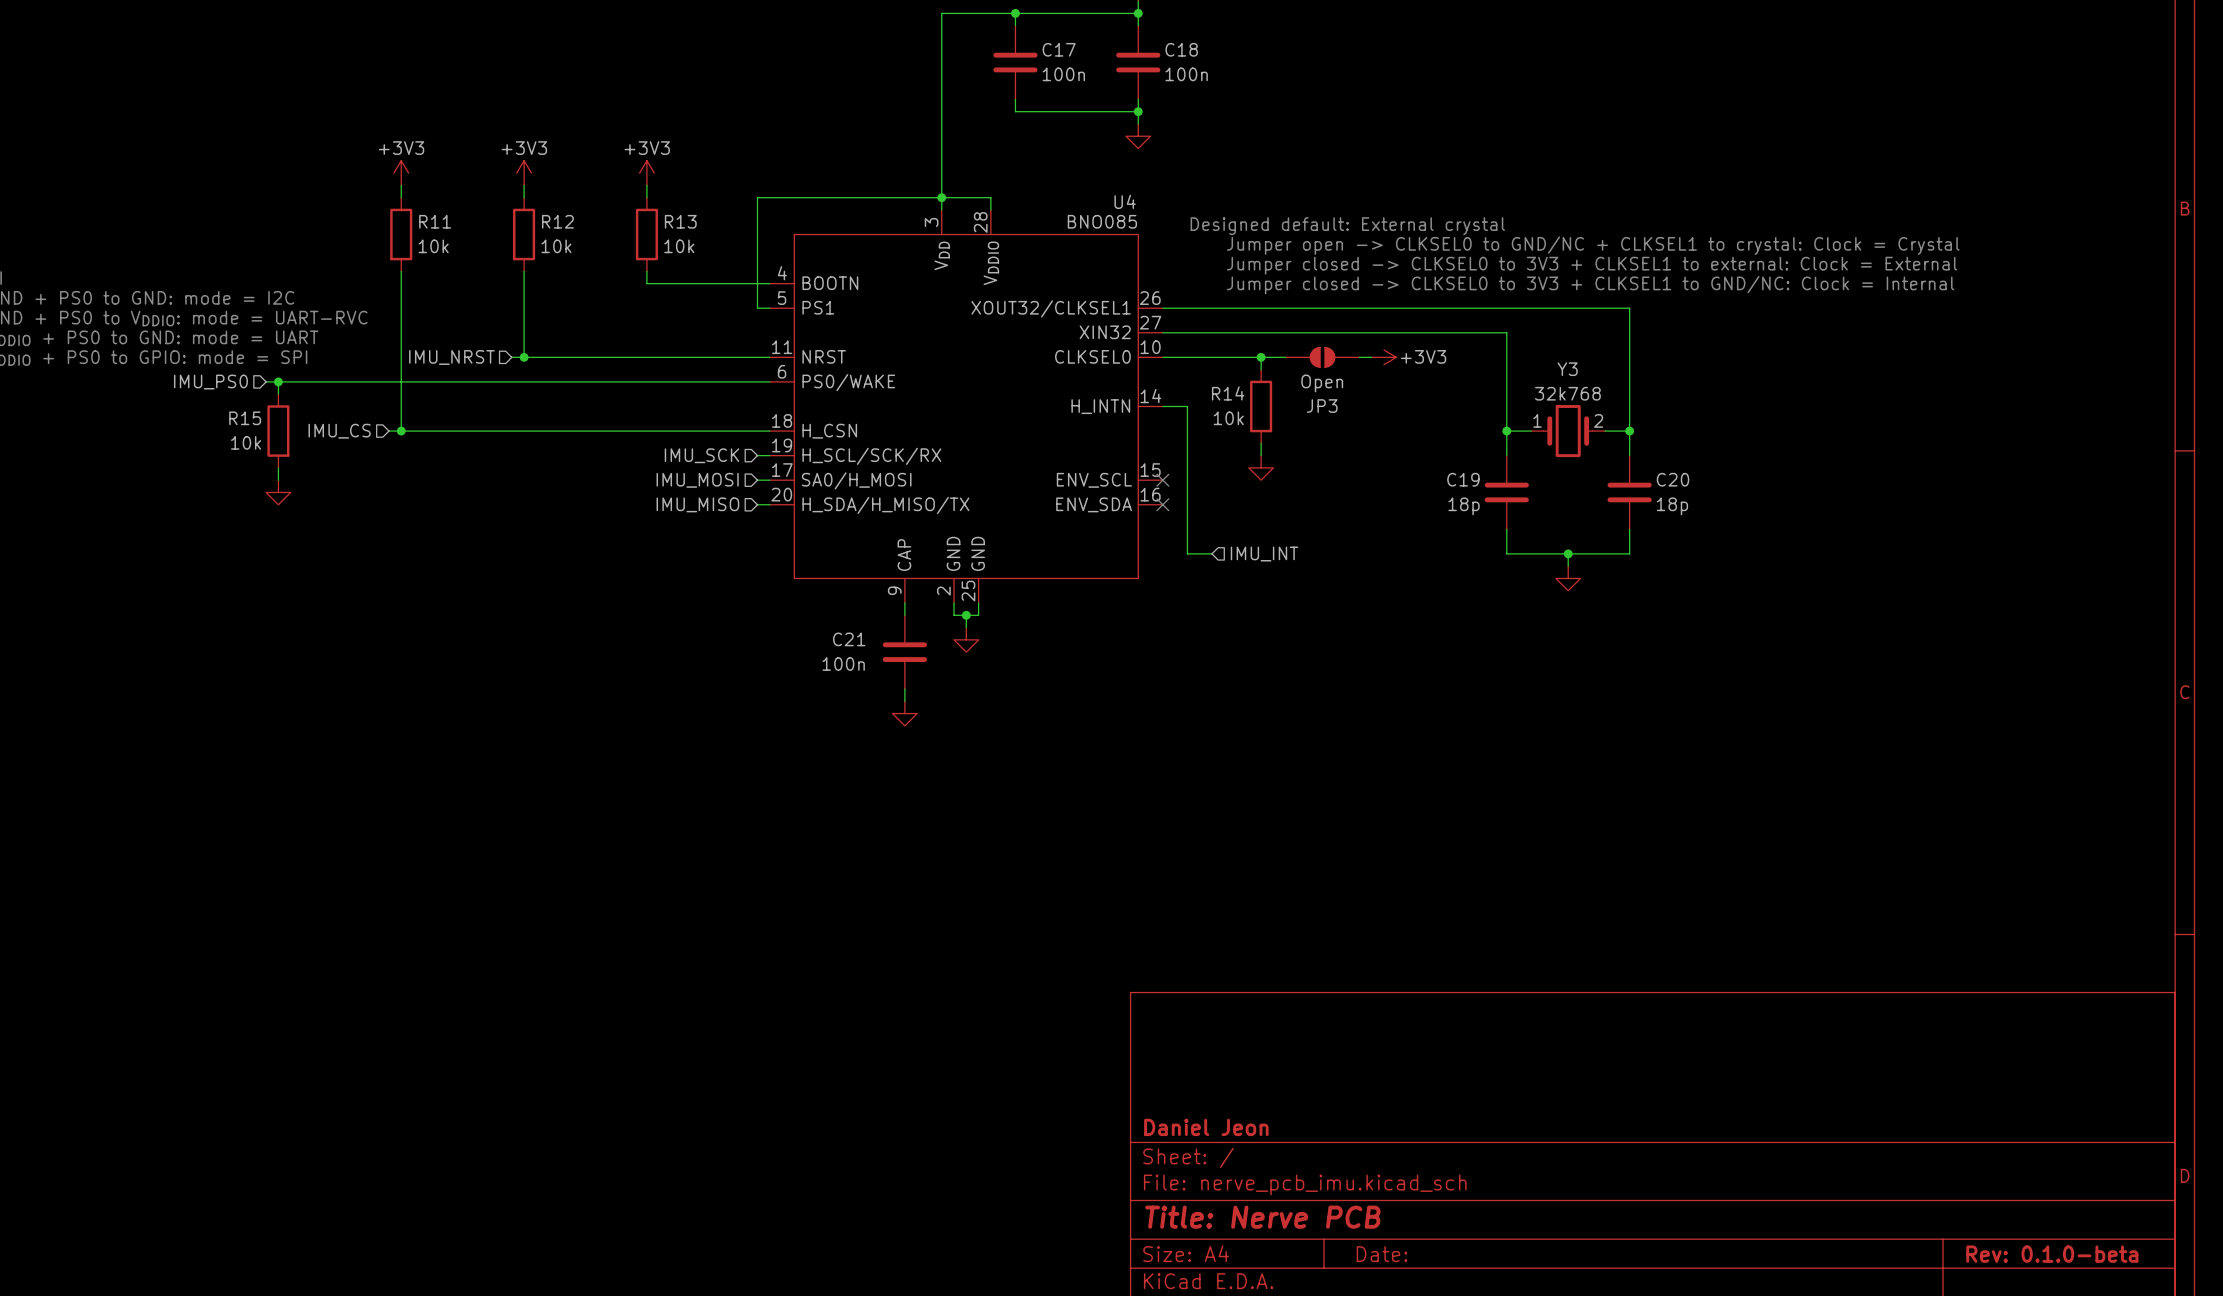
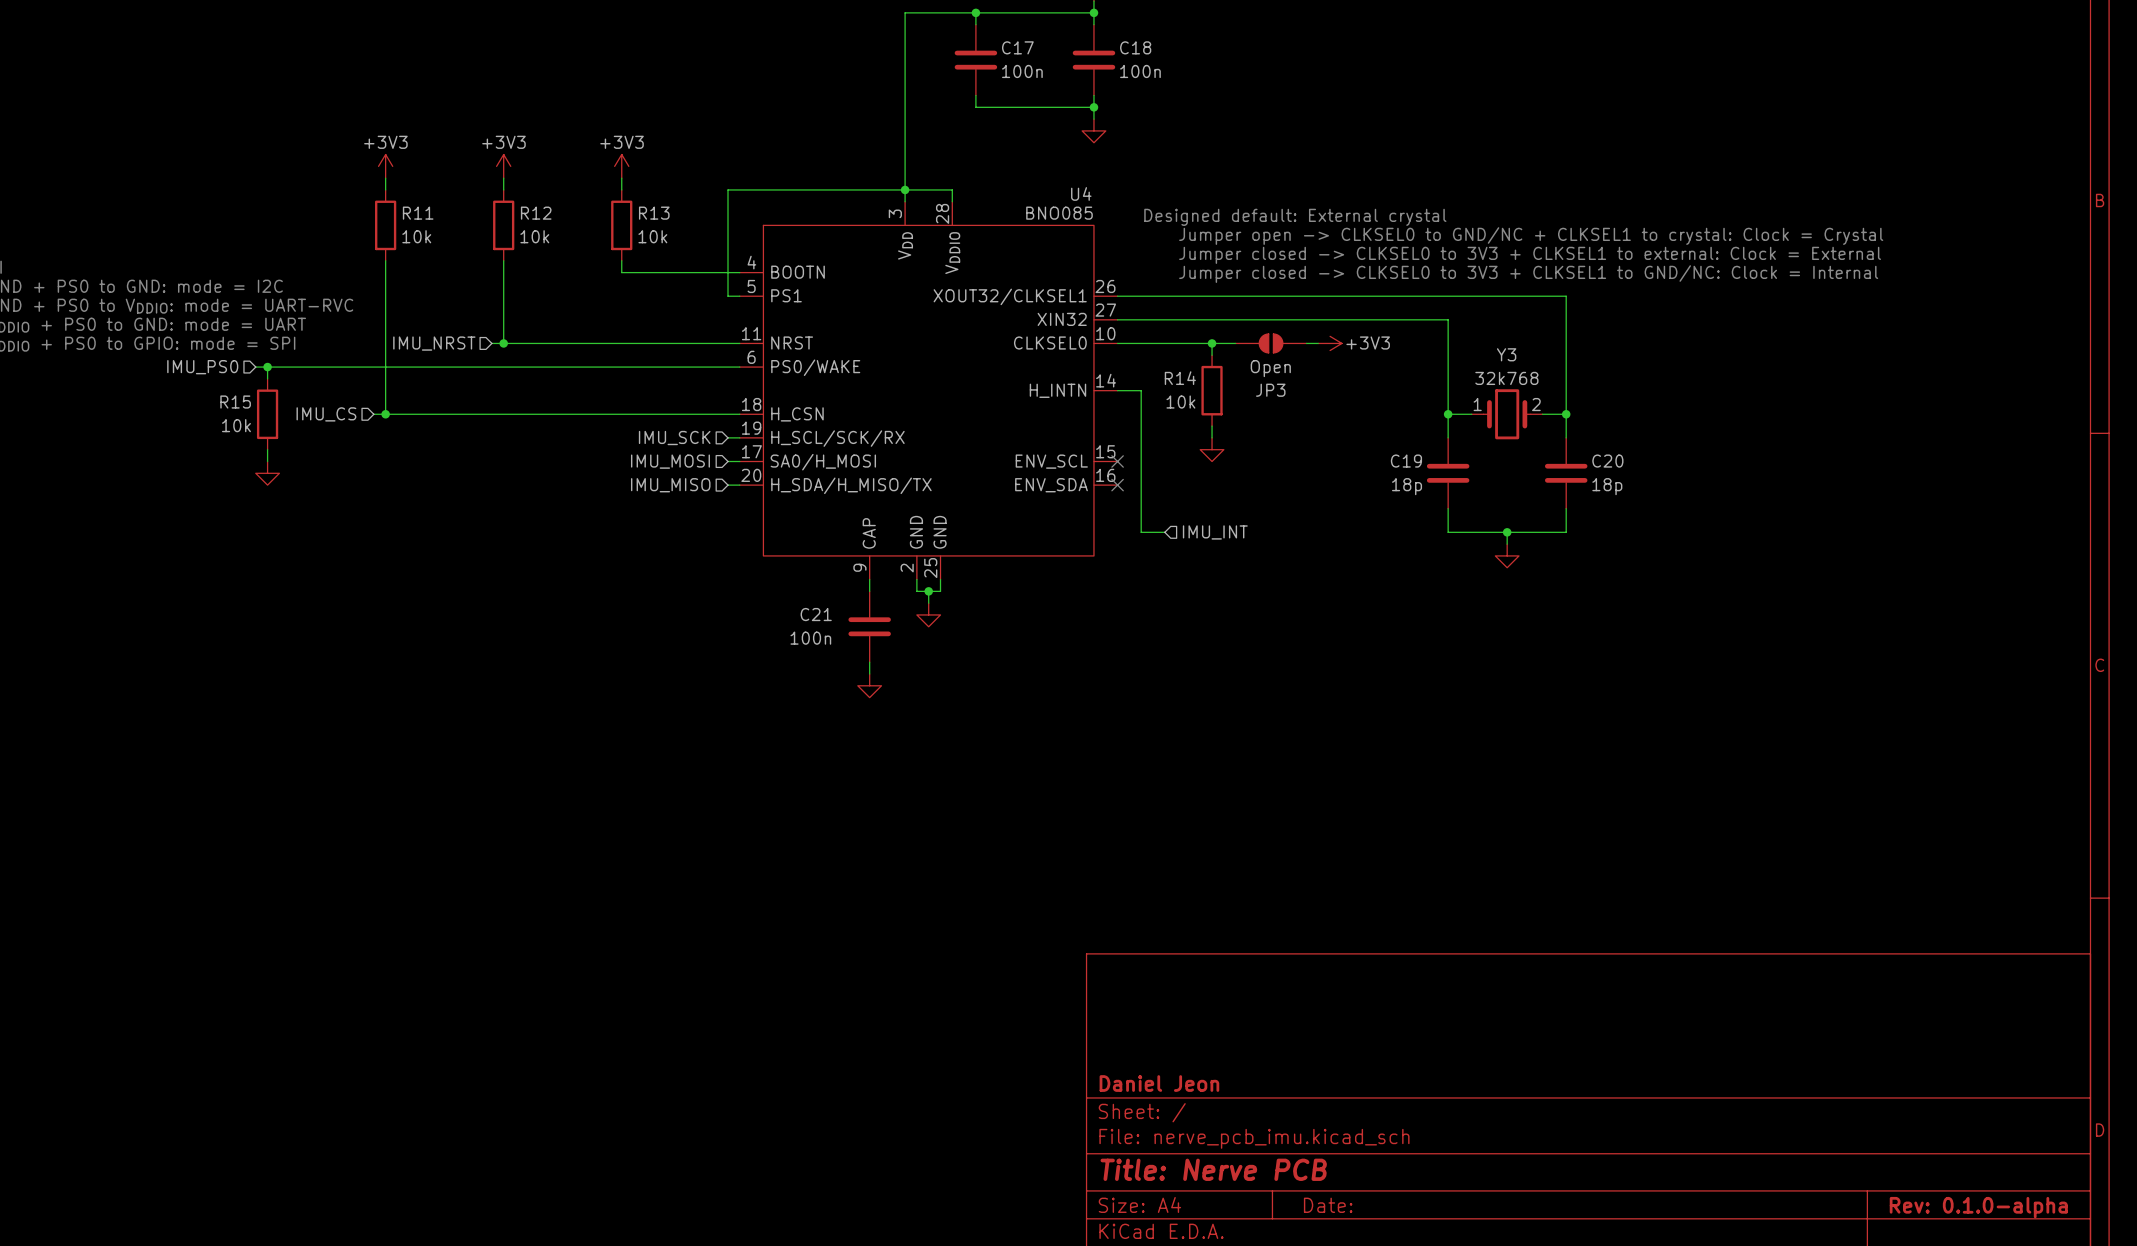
title block: Rev: 0.1.0-beta (2052, 1254) -> Rev: 0.1.0-alpha (1978, 1207)

